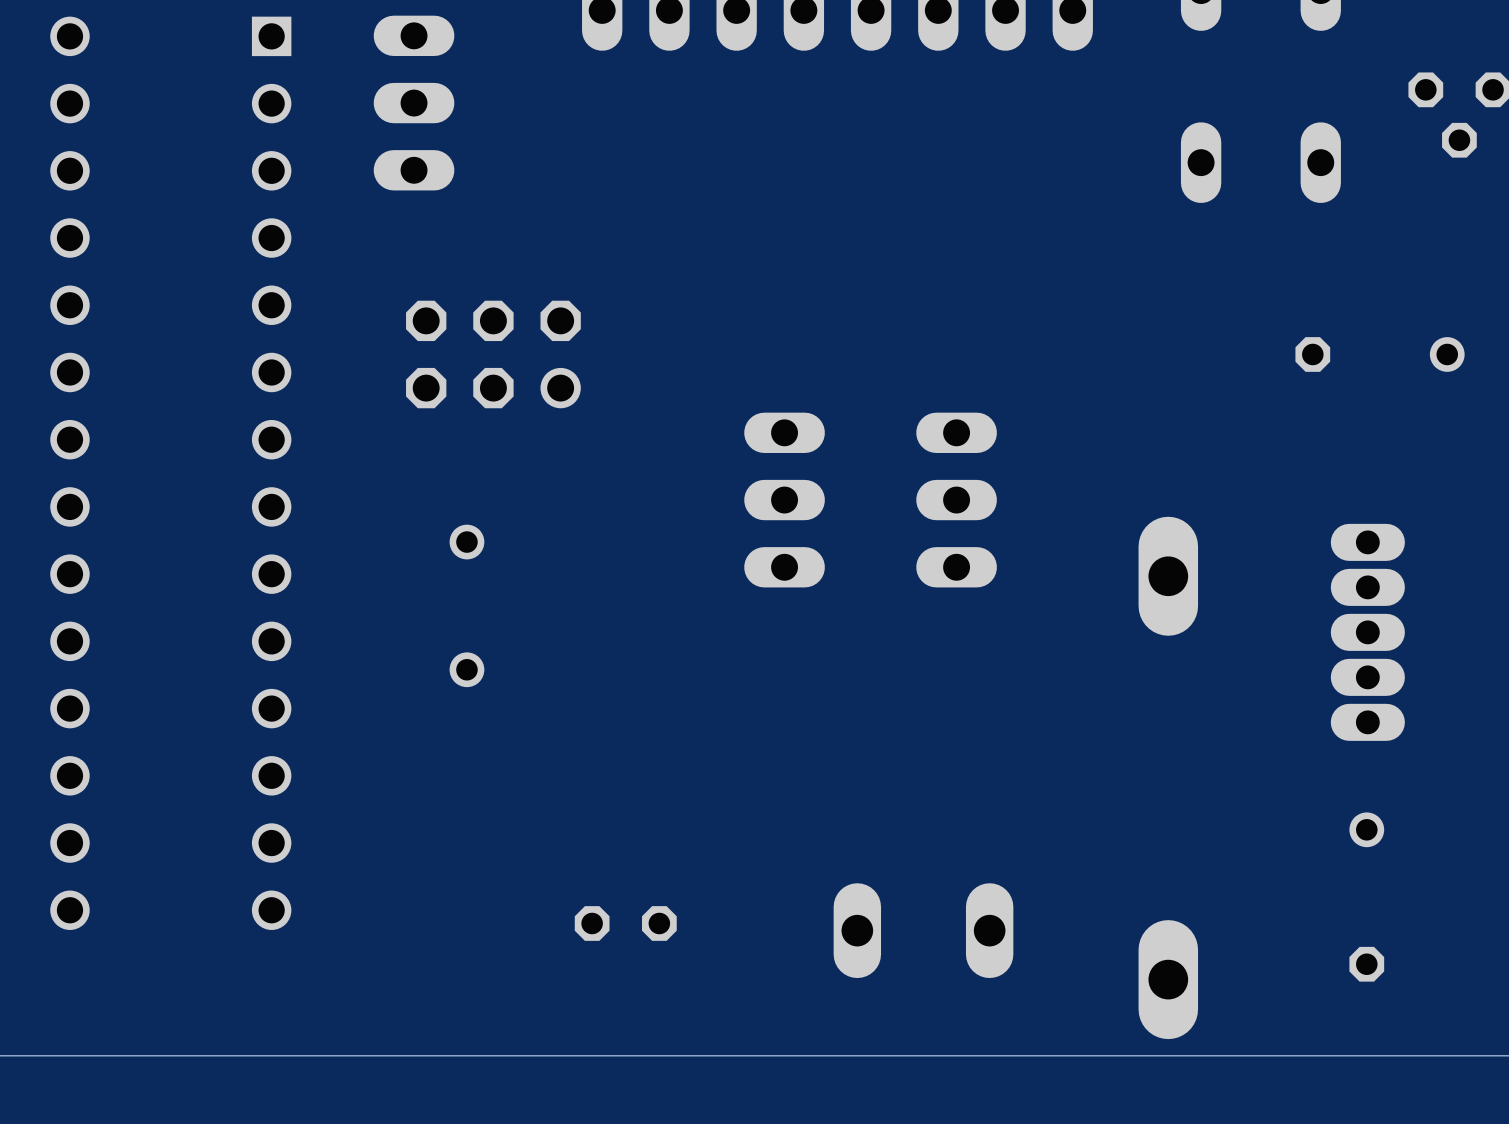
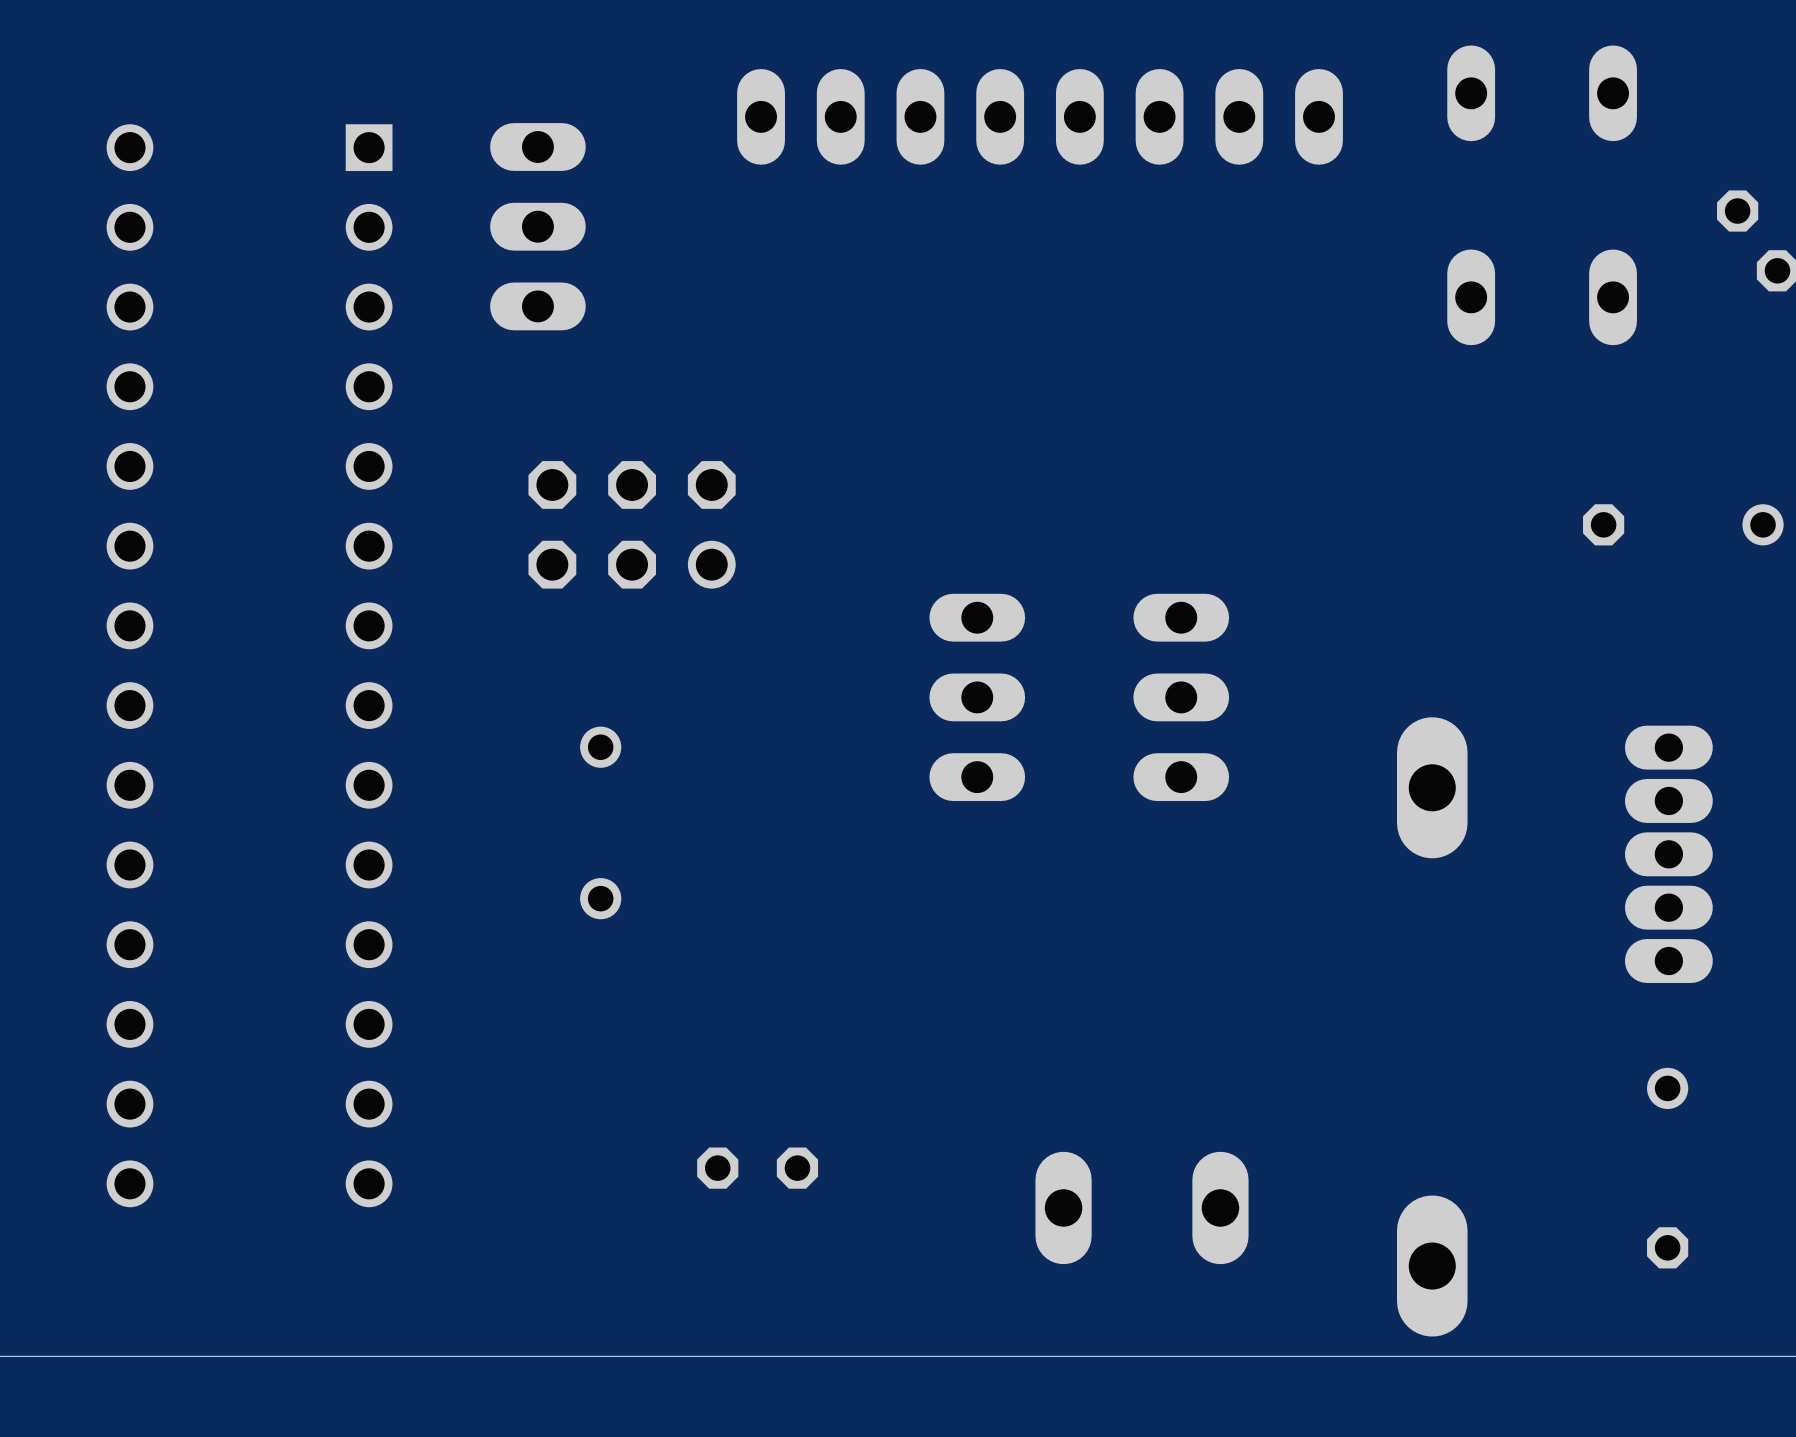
part position: (625, 923) -> (757, 1168)

